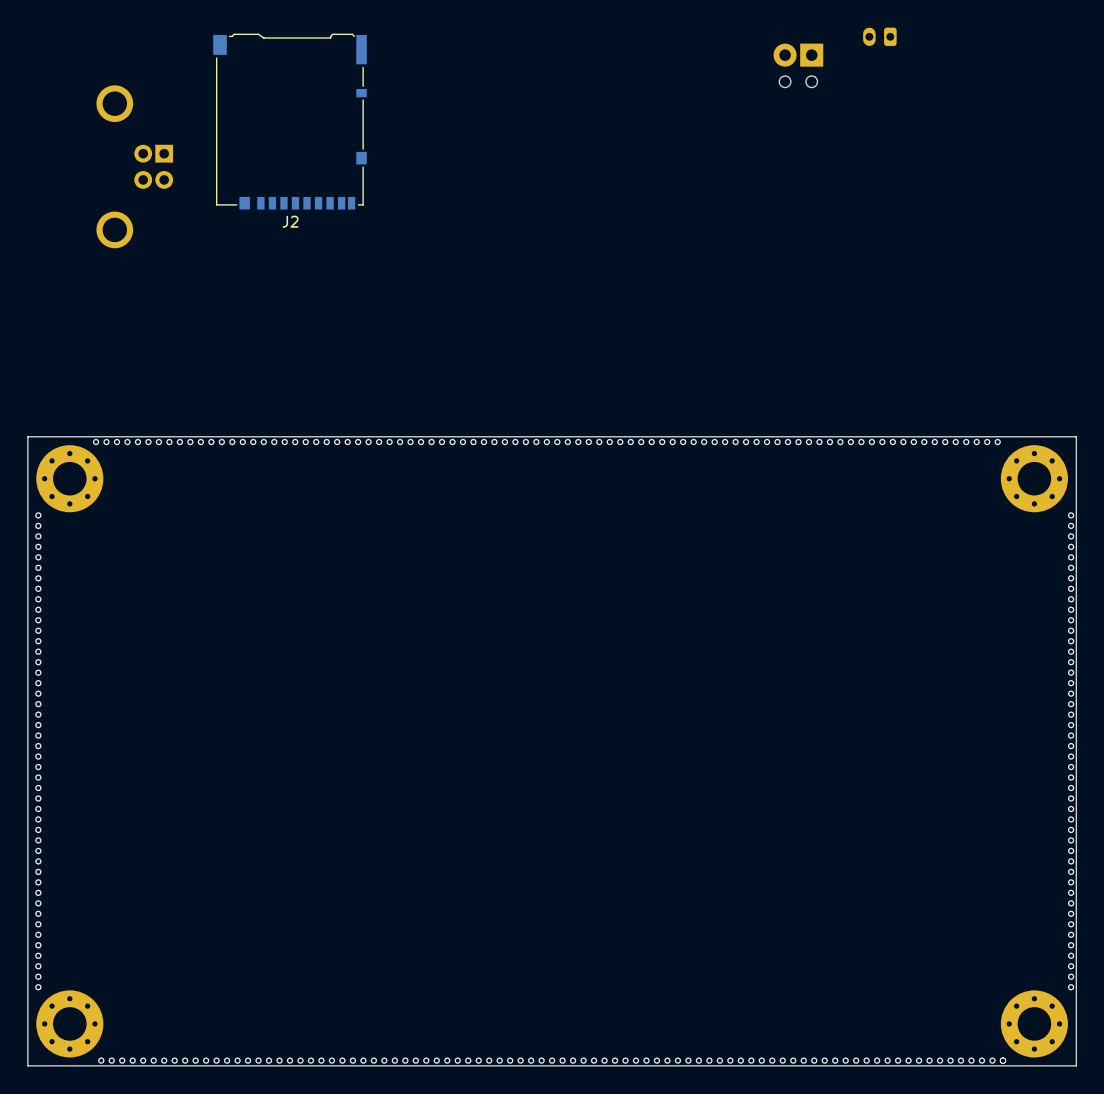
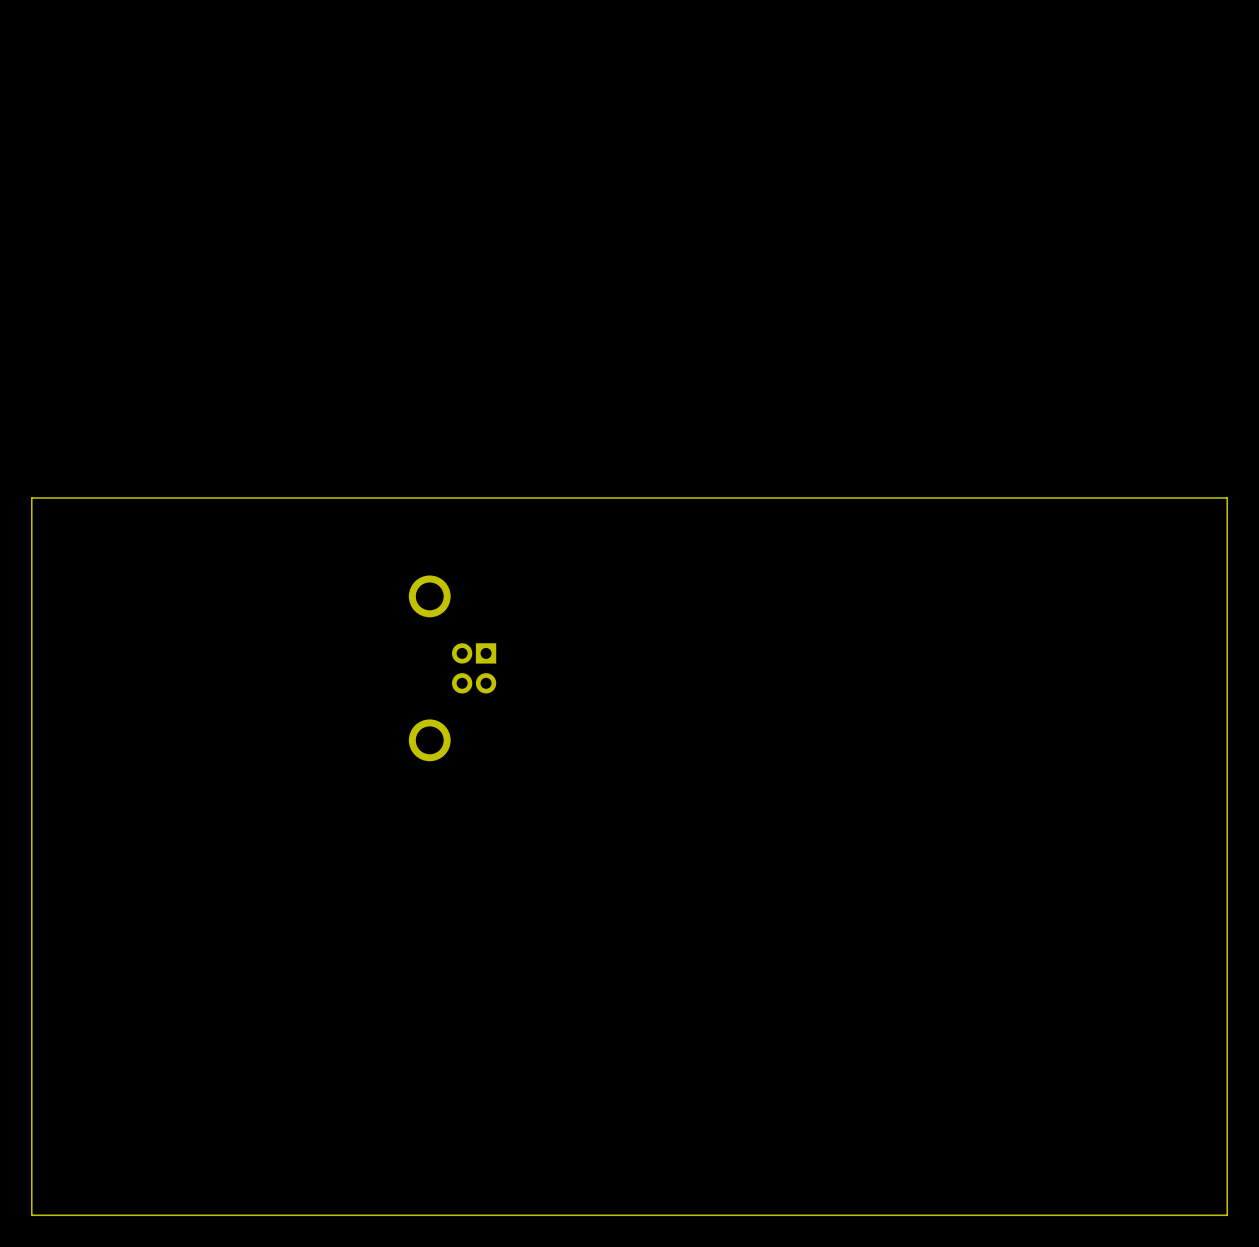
part: (879, 36) -> none
part: (798, 65) -> none
J2: (289, 121) -> none
part: (134, 166) -> none
via: (96, 442) -> none
via: (106, 442) -> none
via: (117, 442) -> none
via: (127, 442) -> none
via: (137, 442) -> none
via: (148, 442) -> none
via: (158, 442) -> none
via: (169, 442) -> none
via: (179, 442) -> none
via: (190, 442) -> none
via: (200, 442) -> none
via: (211, 442) -> none
via: (221, 442) -> none
via: (232, 442) -> none
via: (242, 442) -> none
via: (253, 442) -> none
via: (263, 442) -> none
via: (274, 442) -> none
via: (284, 442) -> none
via: (295, 442) -> none
via: (305, 442) -> none
via: (316, 442) -> none
via: (326, 442) -> none
via: (337, 442) -> none
via: (347, 442) -> none
via: (358, 442) -> none
via: (368, 442) -> none
via: (379, 442) -> none
via: (389, 442) -> none
via: (400, 442) -> none
via: (410, 442) -> none
via: (421, 442) -> none
via: (431, 442) -> none
via: (442, 442) -> none
via: (452, 442) -> none
via: (462, 442) -> none
via: (473, 442) -> none
via: (483, 442) -> none
via: (494, 442) -> none
via: (504, 442) -> none
via: (515, 442) -> none
via: (525, 442) -> none
via: (536, 442) -> none
via: (546, 442) -> none
via: (557, 442) -> none
via: (567, 442) -> none
via: (578, 442) -> none
via: (588, 442) -> none
via: (599, 442) -> none
via: (609, 442) -> none
via: (620, 442) -> none
via: (630, 442) -> none
via: (641, 442) -> none
via: (651, 442) -> none
via: (662, 442) -> none
via: (672, 442) -> none
via: (683, 442) -> none
via: (693, 442) -> none
via: (704, 442) -> none
via: (714, 442) -> none
via: (725, 442) -> none
via: (735, 442) -> none
via: (746, 442) -> none
via: (756, 442) -> none
via: (767, 442) -> none
via: (777, 442) -> none
via: (788, 442) -> none
via: (798, 442) -> none
via: (808, 442) -> none
via: (819, 442) -> none
via: (829, 442) -> none
via: (840, 442) -> none
via: (850, 442) -> none
via: (861, 442) -> none
via: (871, 442) -> none
via: (882, 442) -> none
via: (892, 442) -> none
via: (903, 442) -> none
via: (913, 442) -> none
via: (924, 442) -> none
via: (934, 442) -> none
via: (945, 442) -> none
via: (955, 442) -> none
via: (966, 442) -> none
via: (976, 442) -> none
via: (987, 442) -> none
via: (997, 442) -> none
part: (69, 478) -> none
part: (1034, 478) -> none
via: (38, 515) -> none
via: (1071, 515) -> none
via: (38, 525) -> none
via: (1071, 525) -> none
via: (38, 536) -> none
via: (1071, 536) -> none
via: (38, 546) -> none
via: (1071, 546) -> none
via: (38, 557) -> none
via: (1071, 557) -> none
via: (38, 567) -> none
via: (1071, 567) -> none
via: (38, 578) -> none
via: (1071, 578) -> none
part: none -> (452, 668)
via: (38, 588) -> none
via: (1071, 588) -> none
via: (38, 599) -> none
via: (1071, 599) -> none
via: (38, 609) -> none
via: (1071, 609) -> none
via: (38, 620) -> none
via: (1071, 620) -> none
via: (38, 630) -> none
via: (1071, 630) -> none
via: (38, 641) -> none
via: (1071, 641) -> none
via: (38, 651) -> none
via: (1071, 651) -> none
via: (38, 662) -> none
via: (1071, 662) -> none
via: (38, 672) -> none
via: (1071, 672) -> none
via: (38, 683) -> none
via: (1071, 683) -> none
via: (38, 693) -> none
via: (1071, 693) -> none
via: (38, 704) -> none
via: (1071, 704) -> none
via: (38, 714) -> none
via: (1071, 714) -> none
via: (38, 725) -> none
via: (1071, 725) -> none
via: (38, 735) -> none
via: (1071, 735) -> none
via: (38, 746) -> none
via: (1071, 746) -> none
via: (38, 756) -> none
via: (1071, 756) -> none
via: (38, 767) -> none
via: (1071, 767) -> none
via: (38, 777) -> none
via: (1071, 777) -> none
via: (38, 788) -> none
via: (1071, 788) -> none
via: (38, 798) -> none
via: (1071, 798) -> none
via: (38, 808) -> none
via: (1071, 808) -> none
via: (38, 819) -> none
via: (1071, 819) -> none
via: (38, 829) -> none
via: (1071, 829) -> none
via: (38, 840) -> none
via: (1071, 840) -> none
via: (38, 850) -> none
via: (1071, 850) -> none
via: (38, 861) -> none
via: (1071, 861) -> none
via: (38, 871) -> none
via: (1071, 871) -> none
via: (38, 882) -> none
via: (1071, 882) -> none
via: (38, 892) -> none
via: (1071, 892) -> none
via: (38, 903) -> none
via: (1071, 903) -> none
via: (38, 913) -> none
via: (1071, 913) -> none
via: (38, 924) -> none
via: (1071, 924) -> none
via: (38, 934) -> none
via: (1071, 934) -> none
via: (38, 945) -> none
via: (1071, 945) -> none
via: (38, 955) -> none
via: (1071, 955) -> none
via: (38, 966) -> none
via: (1071, 966) -> none
via: (38, 976) -> none
via: (1071, 976) -> none
via: (38, 987) -> none
via: (1071, 987) -> none
part: (69, 1023) -> none
part: (1034, 1023) -> none
via: (101, 1060) -> none
via: (111, 1060) -> none
via: (122, 1060) -> none
via: (132, 1060) -> none
via: (143, 1060) -> none
via: (153, 1060) -> none
via: (164, 1060) -> none
via: (174, 1060) -> none
via: (185, 1060) -> none
via: (195, 1060) -> none
via: (206, 1060) -> none
via: (216, 1060) -> none
via: (227, 1060) -> none
via: (237, 1060) -> none
via: (248, 1060) -> none
via: (258, 1060) -> none
via: (269, 1060) -> none
via: (279, 1060) -> none
via: (289, 1060) -> none
via: (300, 1060) -> none
via: (310, 1060) -> none
via: (321, 1060) -> none
via: (331, 1060) -> none
via: (342, 1060) -> none
via: (352, 1060) -> none
via: (363, 1060) -> none
via: (373, 1060) -> none
via: (384, 1060) -> none
via: (394, 1060) -> none
via: (405, 1060) -> none
via: (415, 1060) -> none
via: (426, 1060) -> none
via: (436, 1060) -> none
via: (447, 1060) -> none
via: (457, 1060) -> none
via: (468, 1060) -> none
via: (478, 1060) -> none
via: (489, 1060) -> none
via: (499, 1060) -> none
via: (510, 1060) -> none
via: (520, 1060) -> none
via: (531, 1060) -> none
via: (541, 1060) -> none
via: (552, 1060) -> none
via: (562, 1060) -> none
via: (573, 1060) -> none
via: (583, 1060) -> none
via: (594, 1060) -> none
via: (604, 1060) -> none
via: (615, 1060) -> none
via: (625, 1060) -> none
via: (635, 1060) -> none
via: (646, 1060) -> none
via: (656, 1060) -> none
via: (667, 1060) -> none
via: (677, 1060) -> none
via: (688, 1060) -> none
via: (698, 1060) -> none
via: (709, 1060) -> none
via: (719, 1060) -> none
via: (730, 1060) -> none
via: (740, 1060) -> none
via: (751, 1060) -> none
via: (761, 1060) -> none
via: (772, 1060) -> none
via: (782, 1060) -> none
via: (793, 1060) -> none
via: (803, 1060) -> none
via: (814, 1060) -> none
via: (824, 1060) -> none
via: (835, 1060) -> none
via: (845, 1060) -> none
via: (856, 1060) -> none
via: (866, 1060) -> none
via: (877, 1060) -> none
via: (887, 1060) -> none
via: (898, 1060) -> none
via: (908, 1060) -> none
via: (919, 1060) -> none
via: (929, 1060) -> none
via: (940, 1060) -> none
via: (950, 1060) -> none
via: (961, 1060) -> none
via: (971, 1060) -> none
via: (981, 1060) -> none
via: (992, 1060) -> none
via: (1002, 1060) -> none

